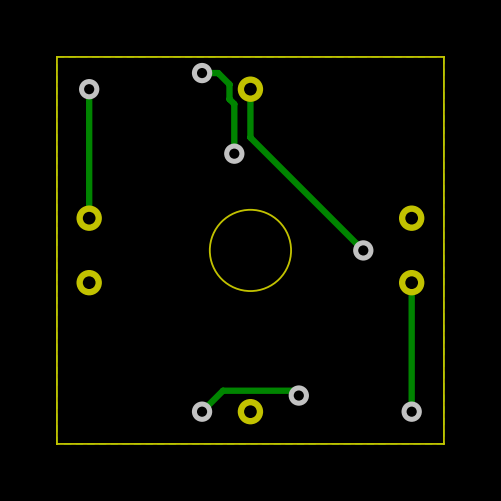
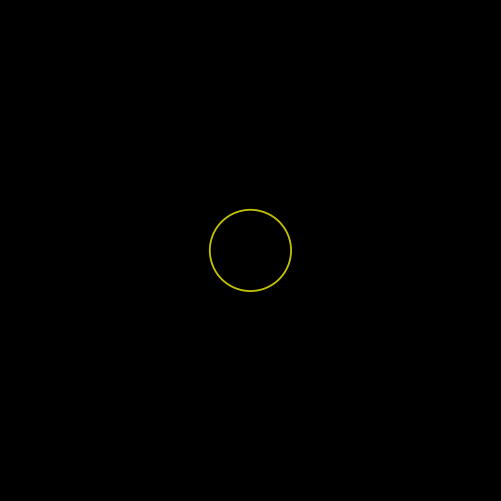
board edge: (443, 56) (443, 443) (56, 443) (56, 56) (443, 56) -> none
track: (202, 73) (218, 73) (229, 84) (229, 99) (234, 104) (234, 153) -> none
via: (202, 73) -> none
track: (89, 89) (89, 218) -> none
via: (89, 89) -> none
track: (250, 89) (250, 137) (363, 250) -> none
part: (250, 89) -> none
via: (234, 153) -> none
part: (89, 218) -> none
part: (411, 218) -> none
via: (363, 250) -> none
part: (89, 282) -> none
track: (411, 282) (411, 411) -> none
part: (411, 282) -> none
track: (298, 395) (293, 390) (223, 390) (202, 411) -> none
via: (298, 395) -> none
via: (202, 411) -> none
part: (250, 411) -> none
via: (411, 411) -> none

